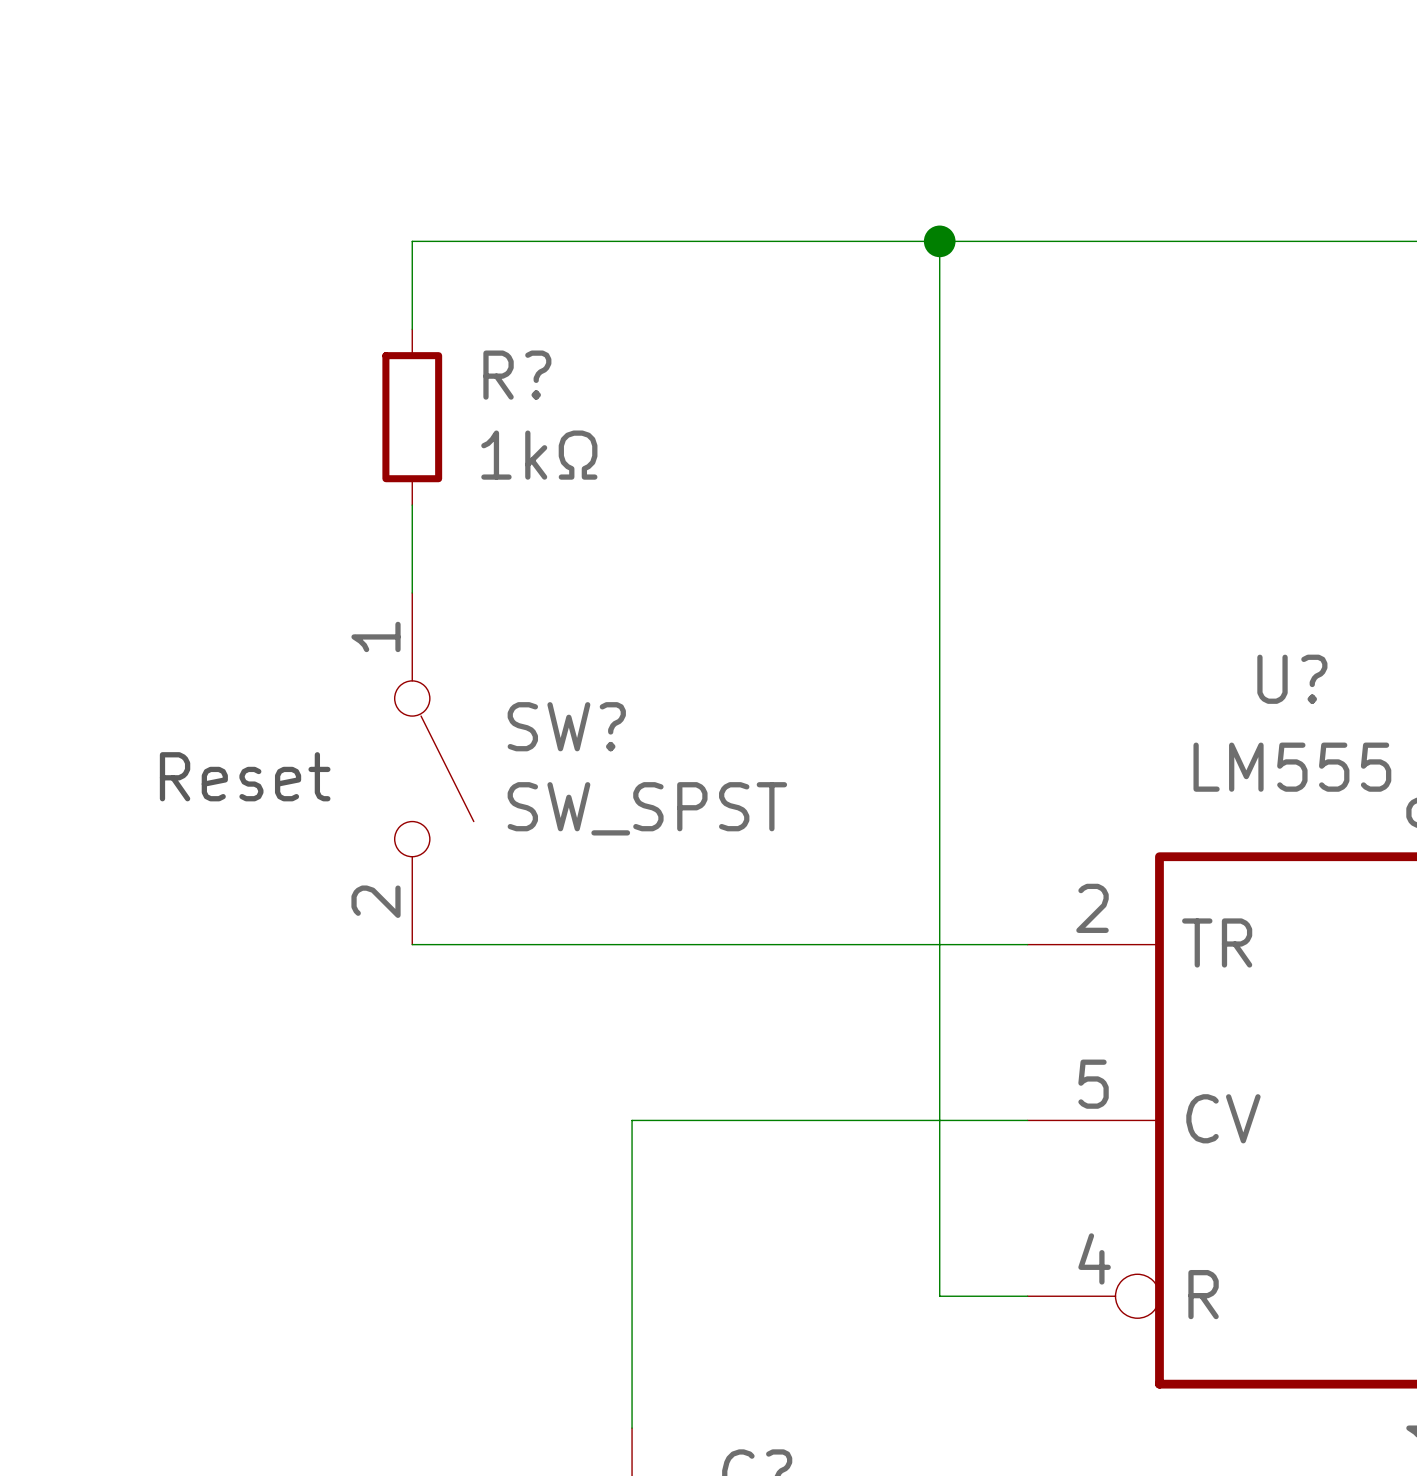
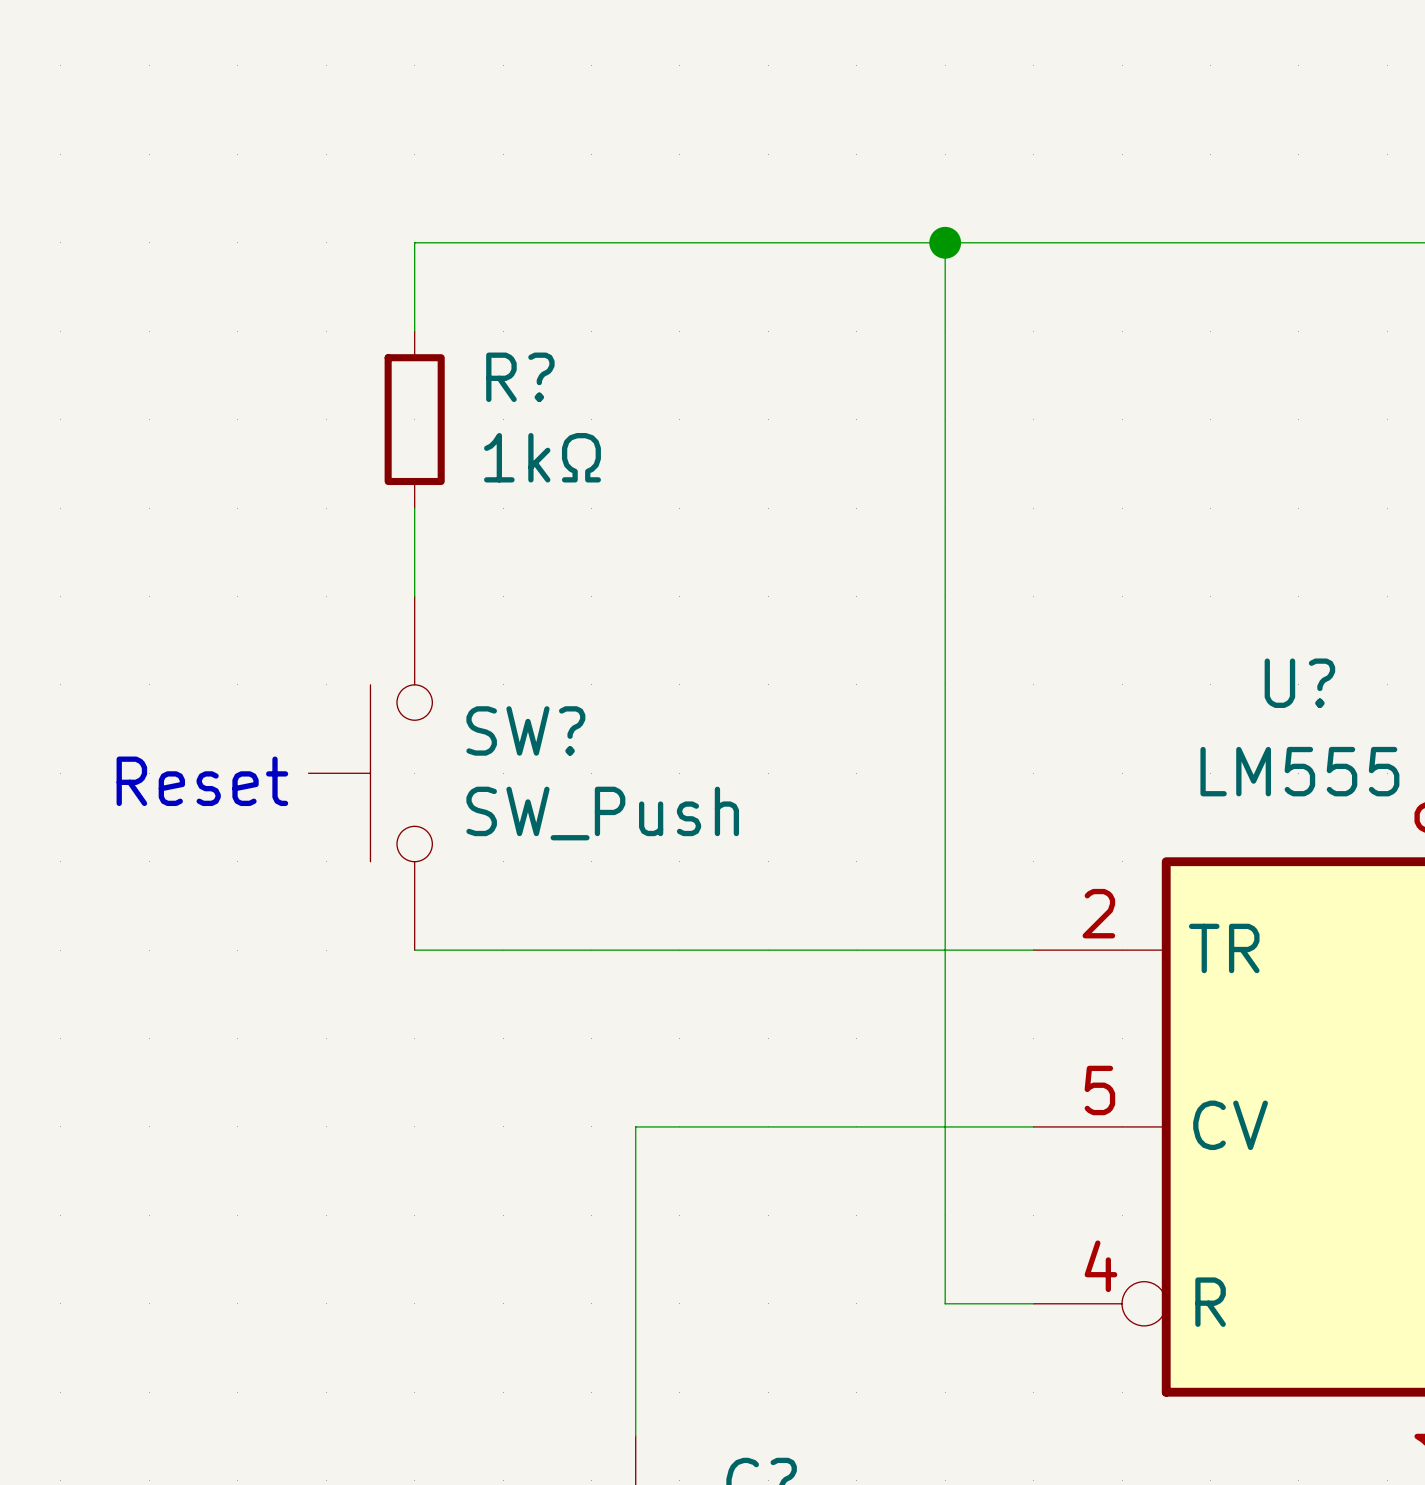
SW?: none -> SW_Push (370, 773)
SW?: SW_SPST (434, 768) -> none
text position: Reset (245, 776) -> Reset (202, 781)

